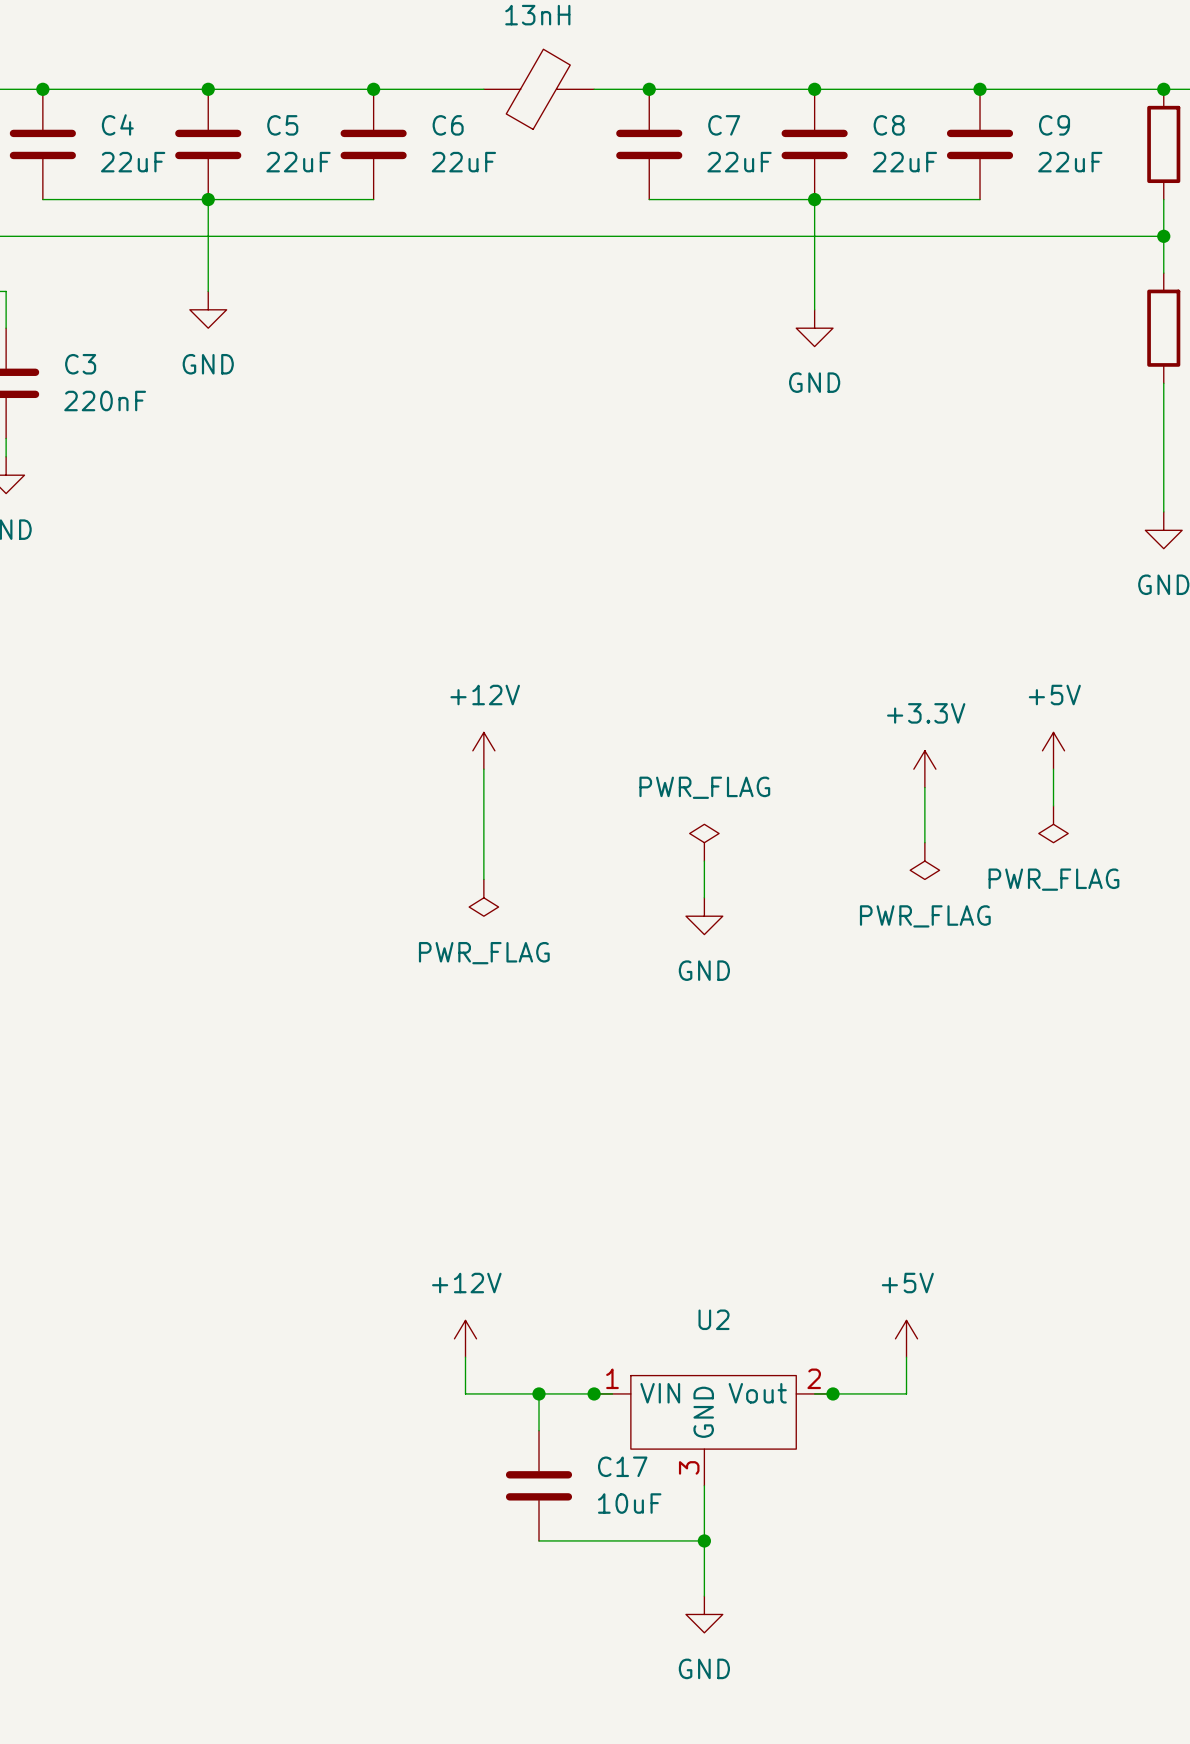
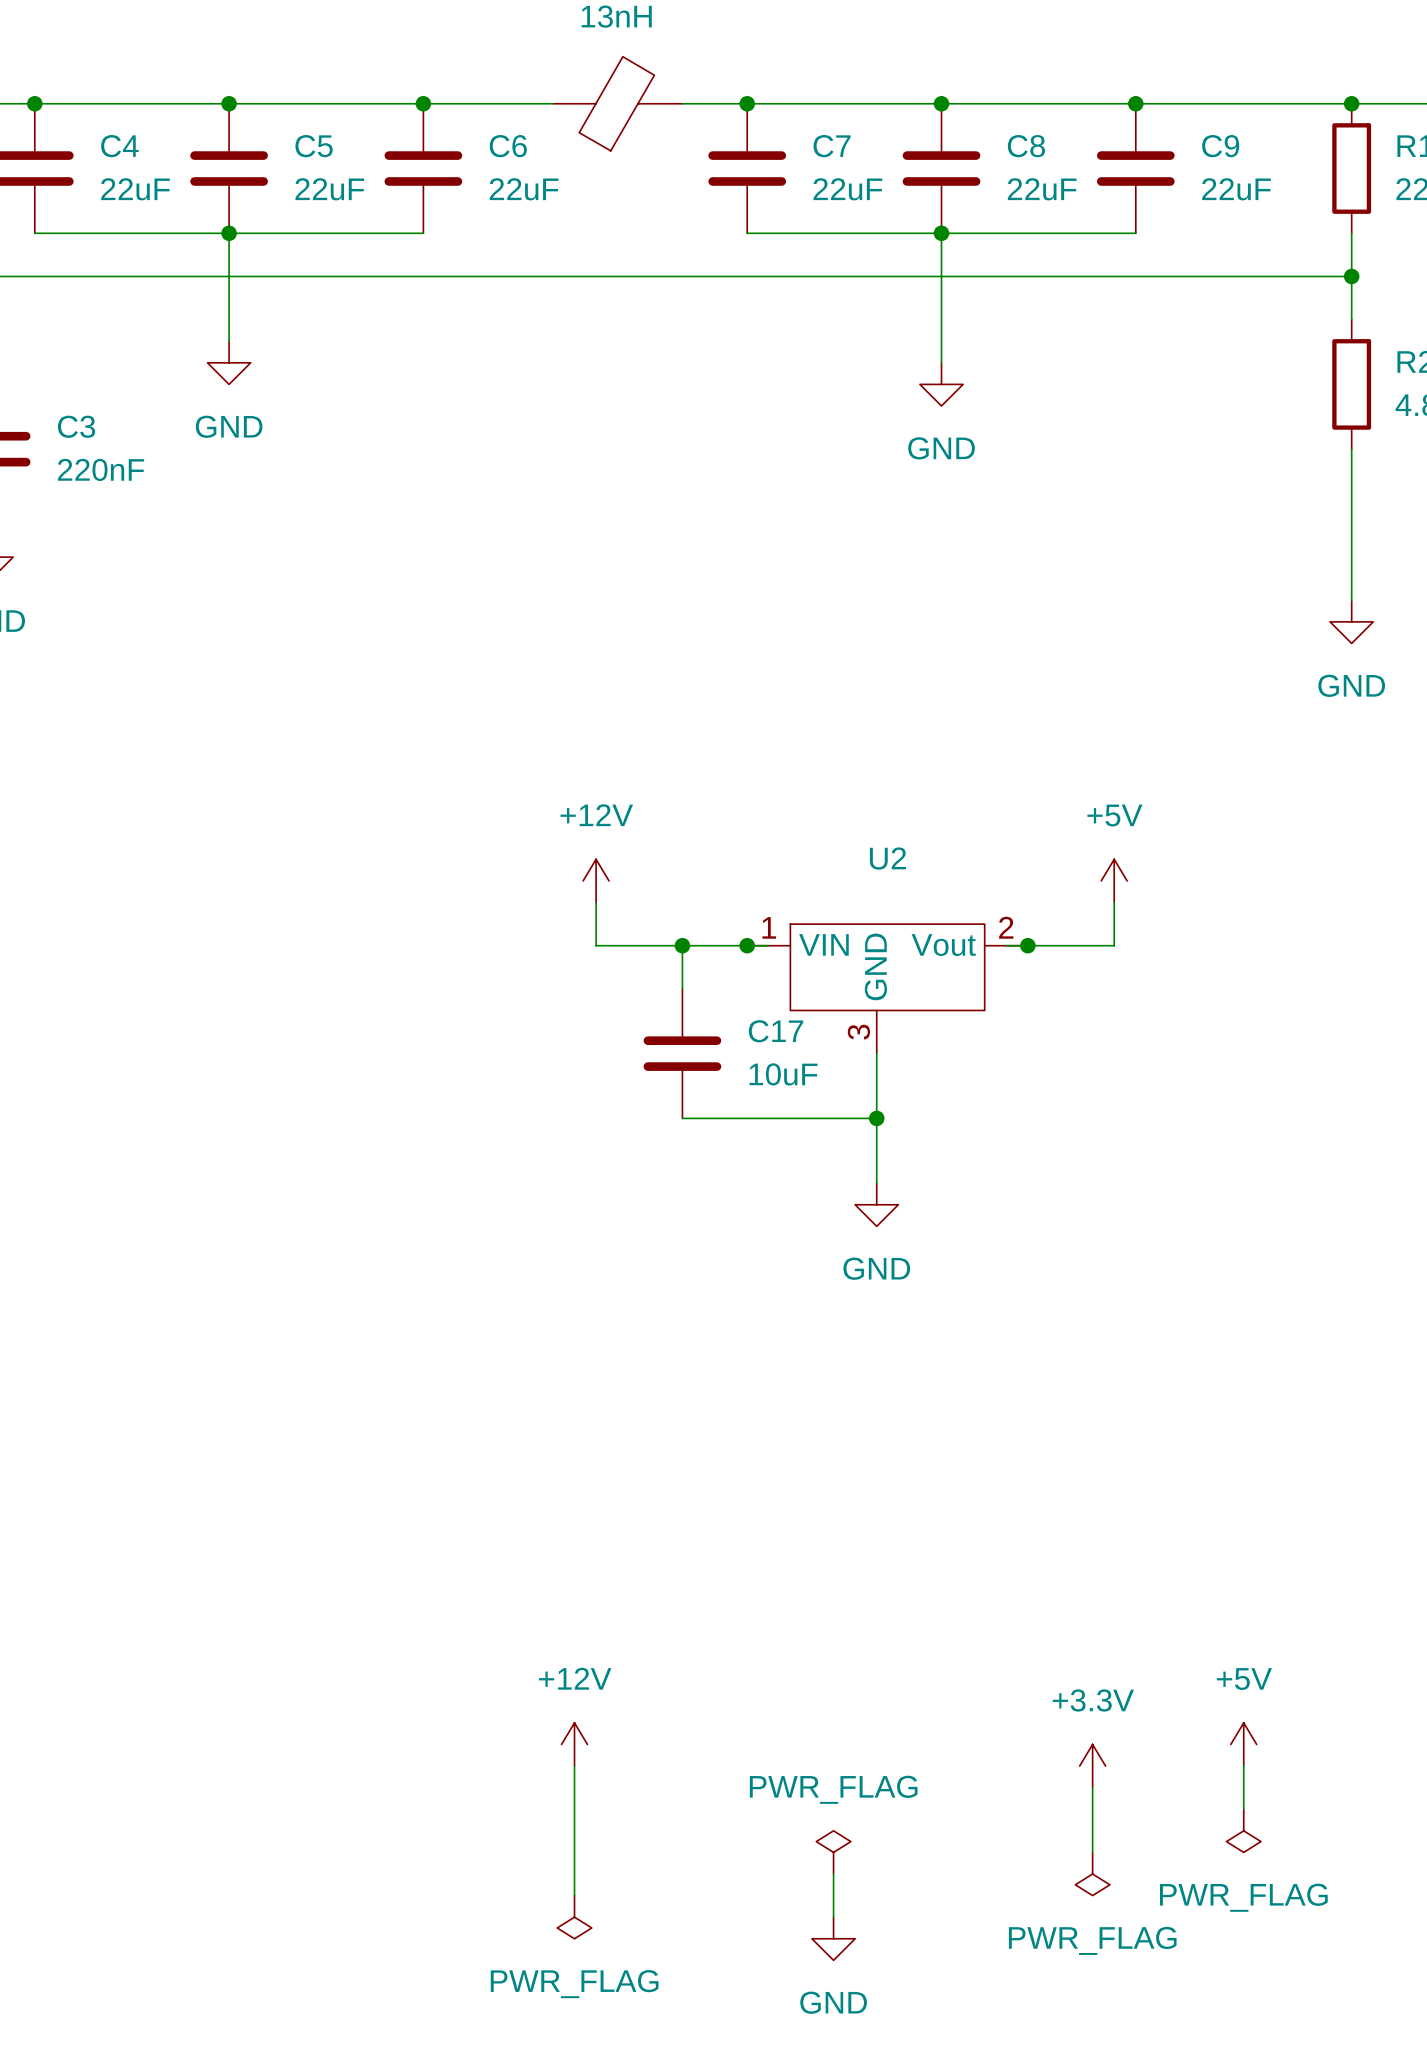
power symbol position: +12V (483, 750) -> +12V (596, 880)
power symbol position: +5V (1053, 750) -> +5V (1114, 880)
wire: (483, 769) (483, 879) -> (876, 1053) (876, 1183)
wire: none -> (596, 902) (596, 945) (768, 945)
power symbol: +3.3V (924, 769) -> none
wire: none -> (1114, 902) (1114, 945) (1006, 945)
wire: (1053, 769) (1053, 805) -> none
wire: (924, 787) (924, 842) -> none
junction: none -> (682, 945)
junction: none -> (747, 945)
junction: none -> (1027, 945)
power symbol: PWR_FLAG (1053, 824) -> none
power symbol: PWR_FLAG (704, 842) -> none
wire: (704, 861) (704, 897) -> (682, 945) (682, 988)
power symbol: PWR_FLAG (924, 861) -> none
power symbol: PWR_FLAG (483, 897) -> none
power symbol position: GND (704, 916) -> GND (876, 1204)
wire: none -> (682, 1118) (876, 1118)
junction: none -> (876, 1118)
power symbol position: +12V (465, 1338) -> +12V (574, 1744)
power symbol position: +5V (906, 1338) -> +5V (1243, 1744)
wire: (465, 1357) (465, 1393) (612, 1393) -> none
wire: (906, 1357) (906, 1393) (814, 1393) -> none
wire: (539, 1393) (539, 1430) -> (833, 1874) (833, 1917)
junction: (539, 1393) -> none
junction: (594, 1393) -> none
junction: (833, 1393) -> none
U2 position: (713, 1430) -> (887, 988)
C17 position: (539, 1485) -> (682, 1053)
wire: (704, 1485) (704, 1596) -> (574, 1766) (574, 1895)
power symbol: none -> +3.3V (1092, 1766)
wire: none -> (1243, 1766) (1243, 1809)
wire: none -> (1092, 1787) (1092, 1852)
wire: (539, 1540) (704, 1540) -> none
junction: (704, 1540) -> none
power symbol: none -> PWR_FLAG (1243, 1830)
power symbol: none -> PWR_FLAG (833, 1852)
power symbol: none -> PWR_FLAG (1092, 1874)
power symbol position: GND (704, 1614) -> GND (833, 1938)
power symbol: none -> PWR_FLAG (574, 1917)

